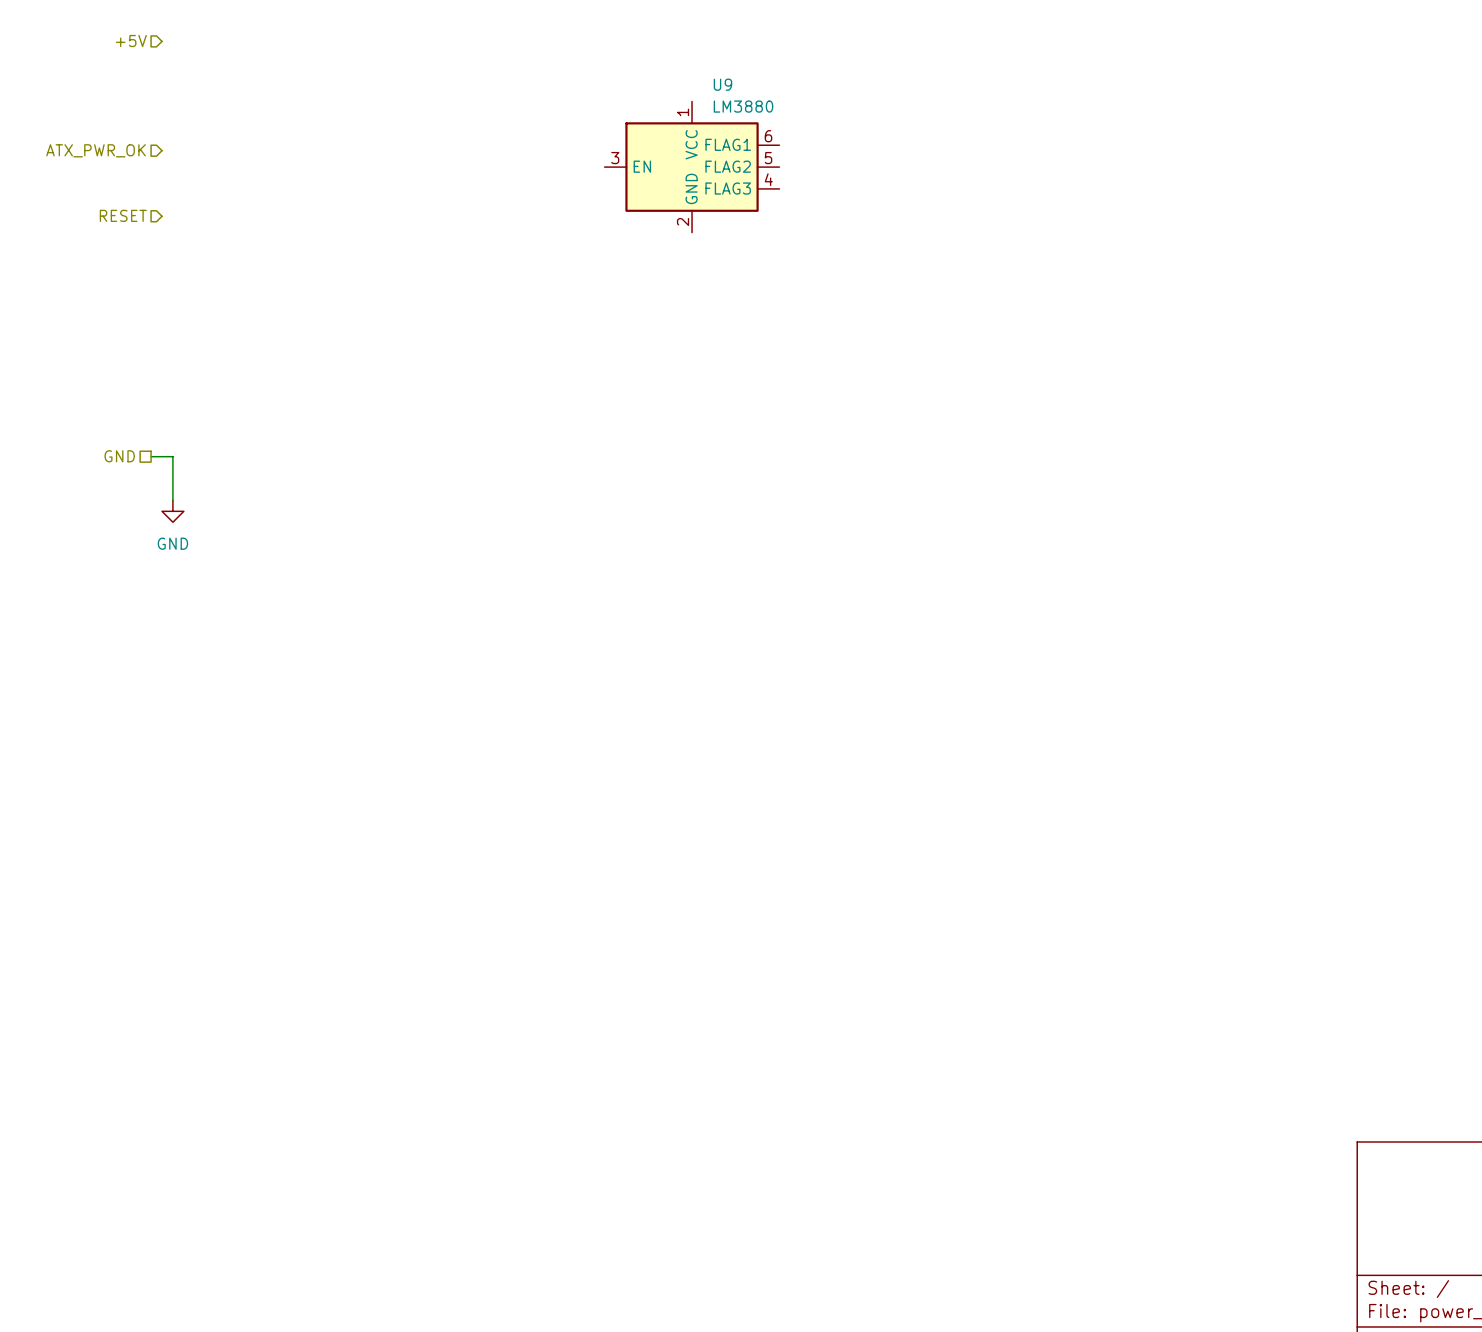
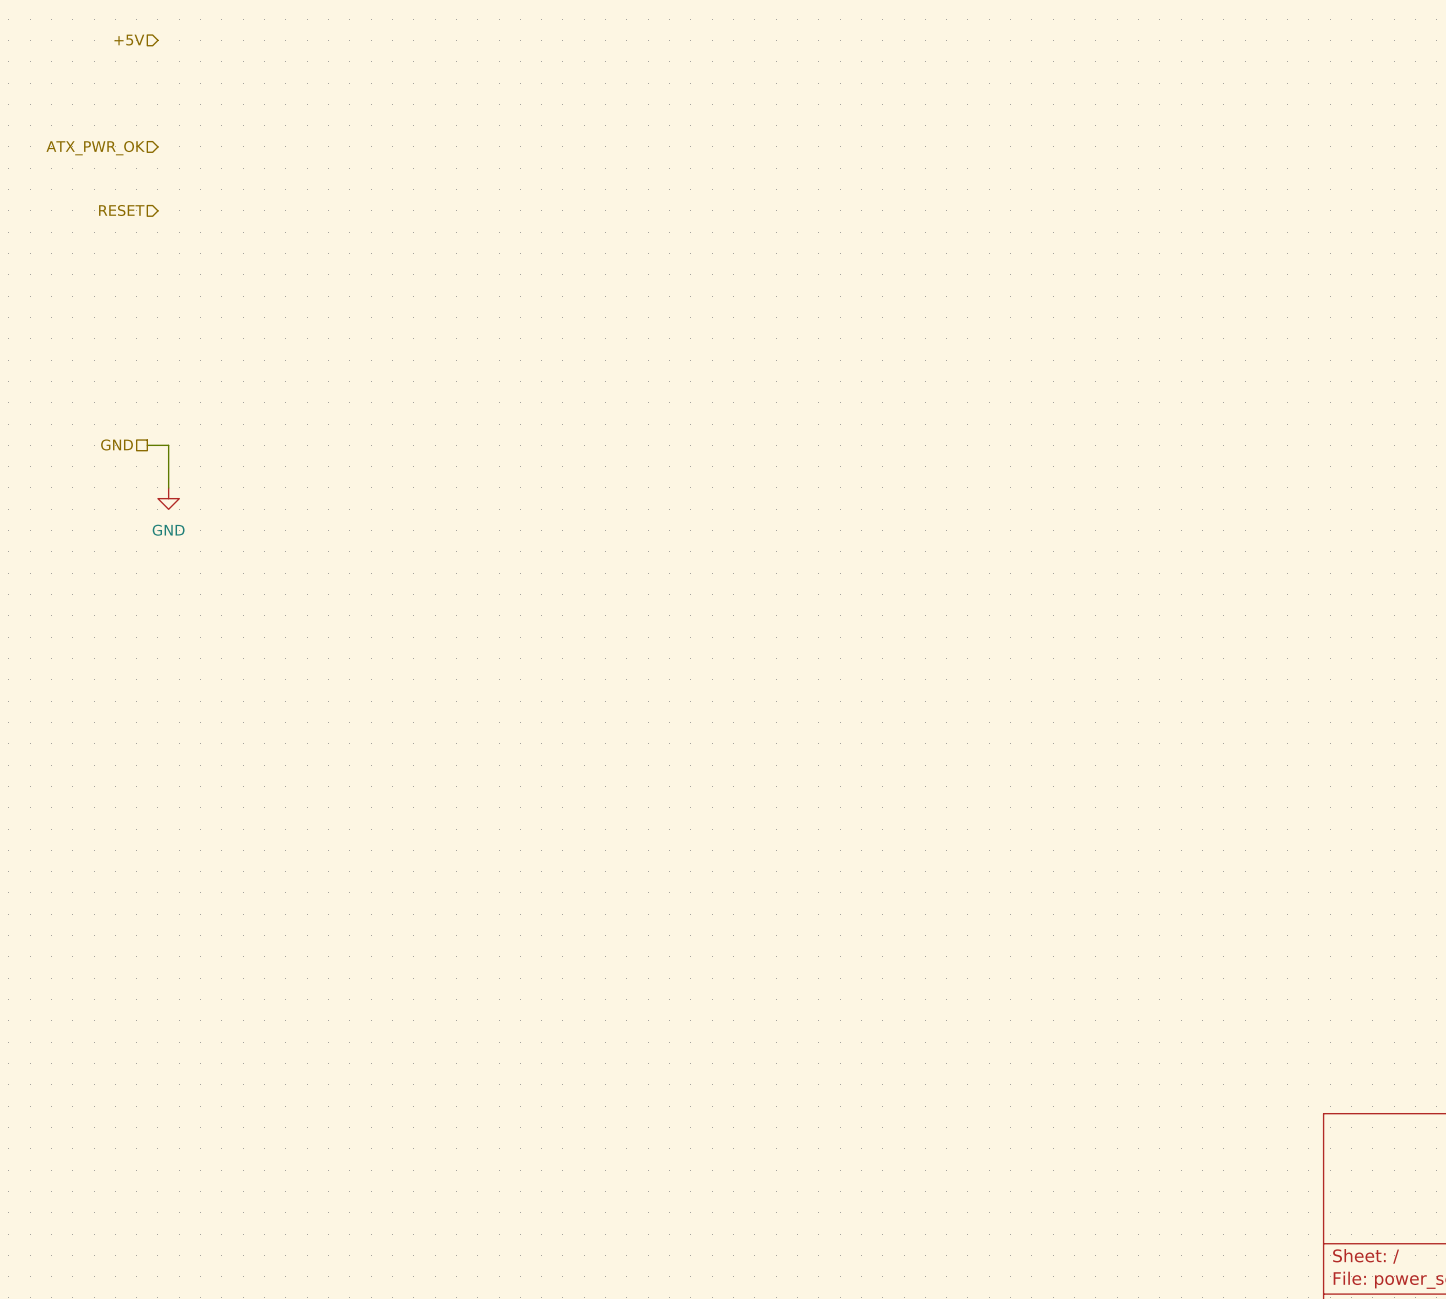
U9: LM3880 (692, 167) -> none

